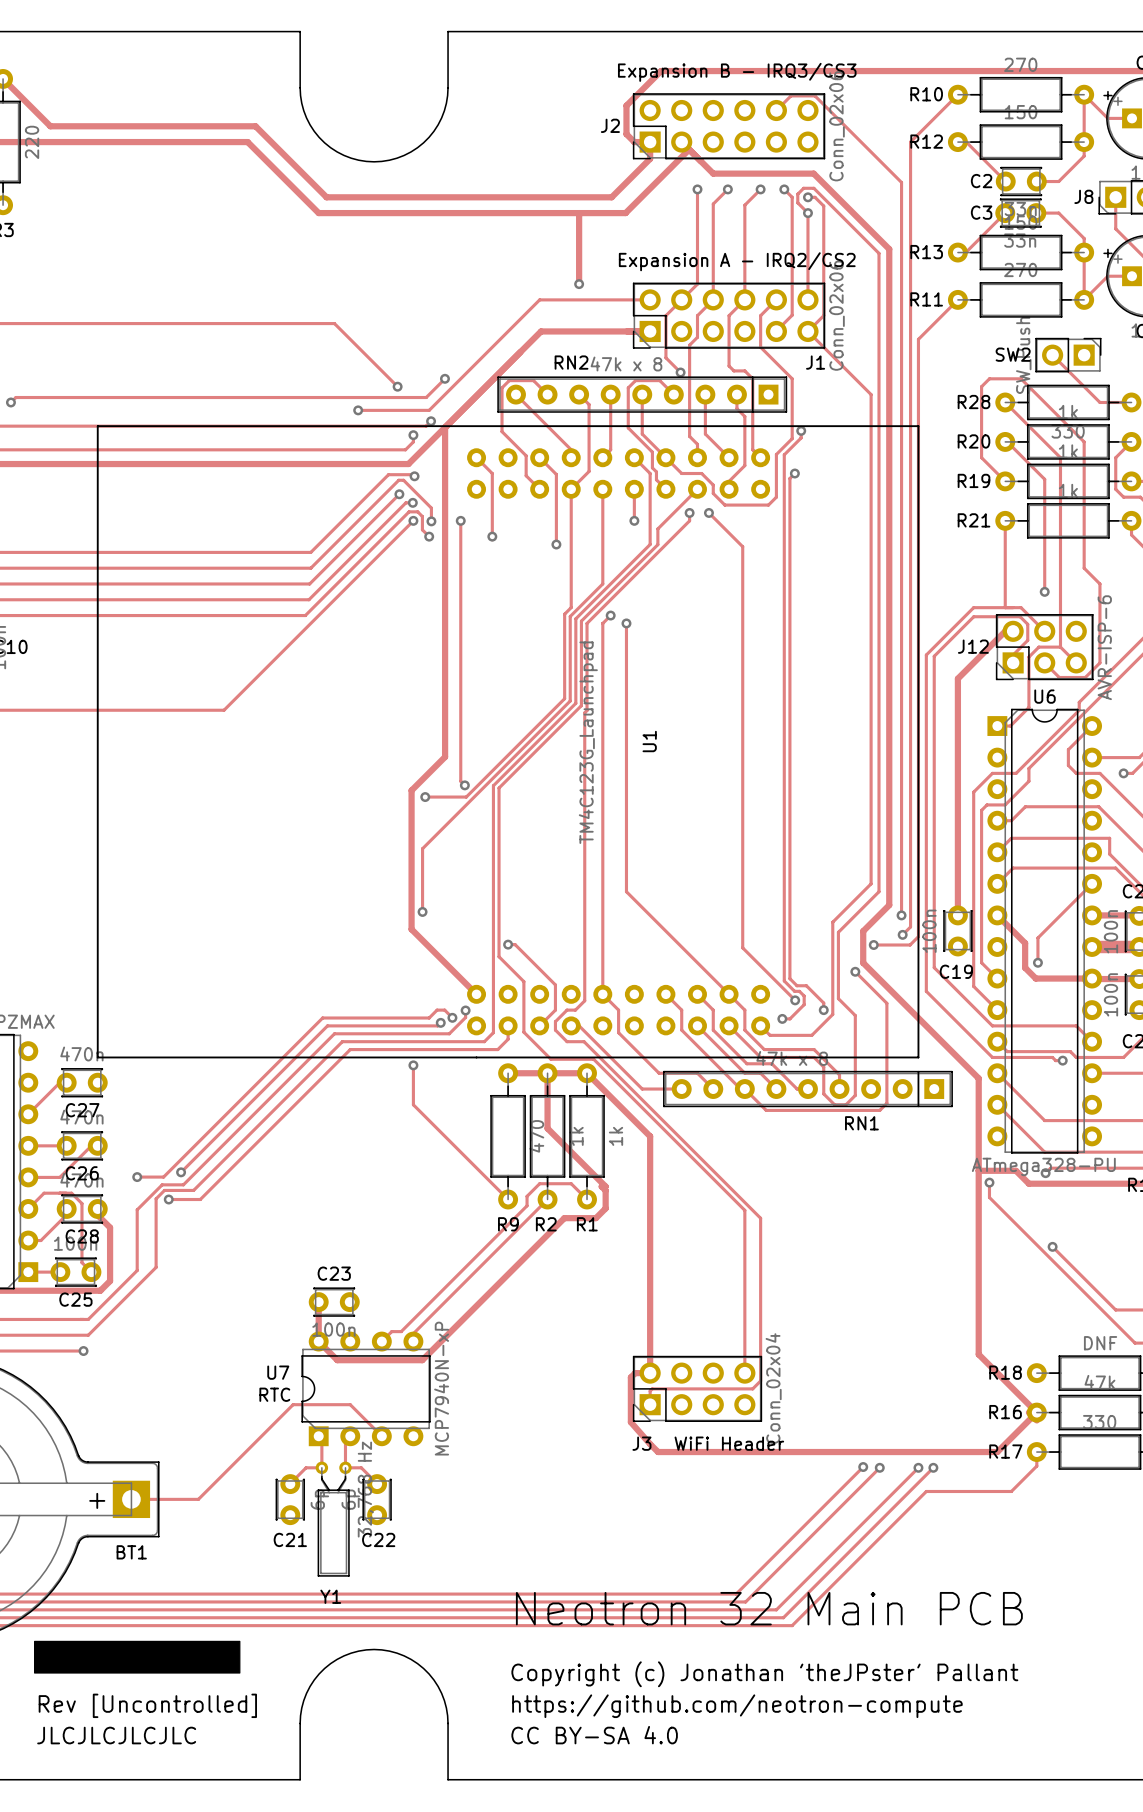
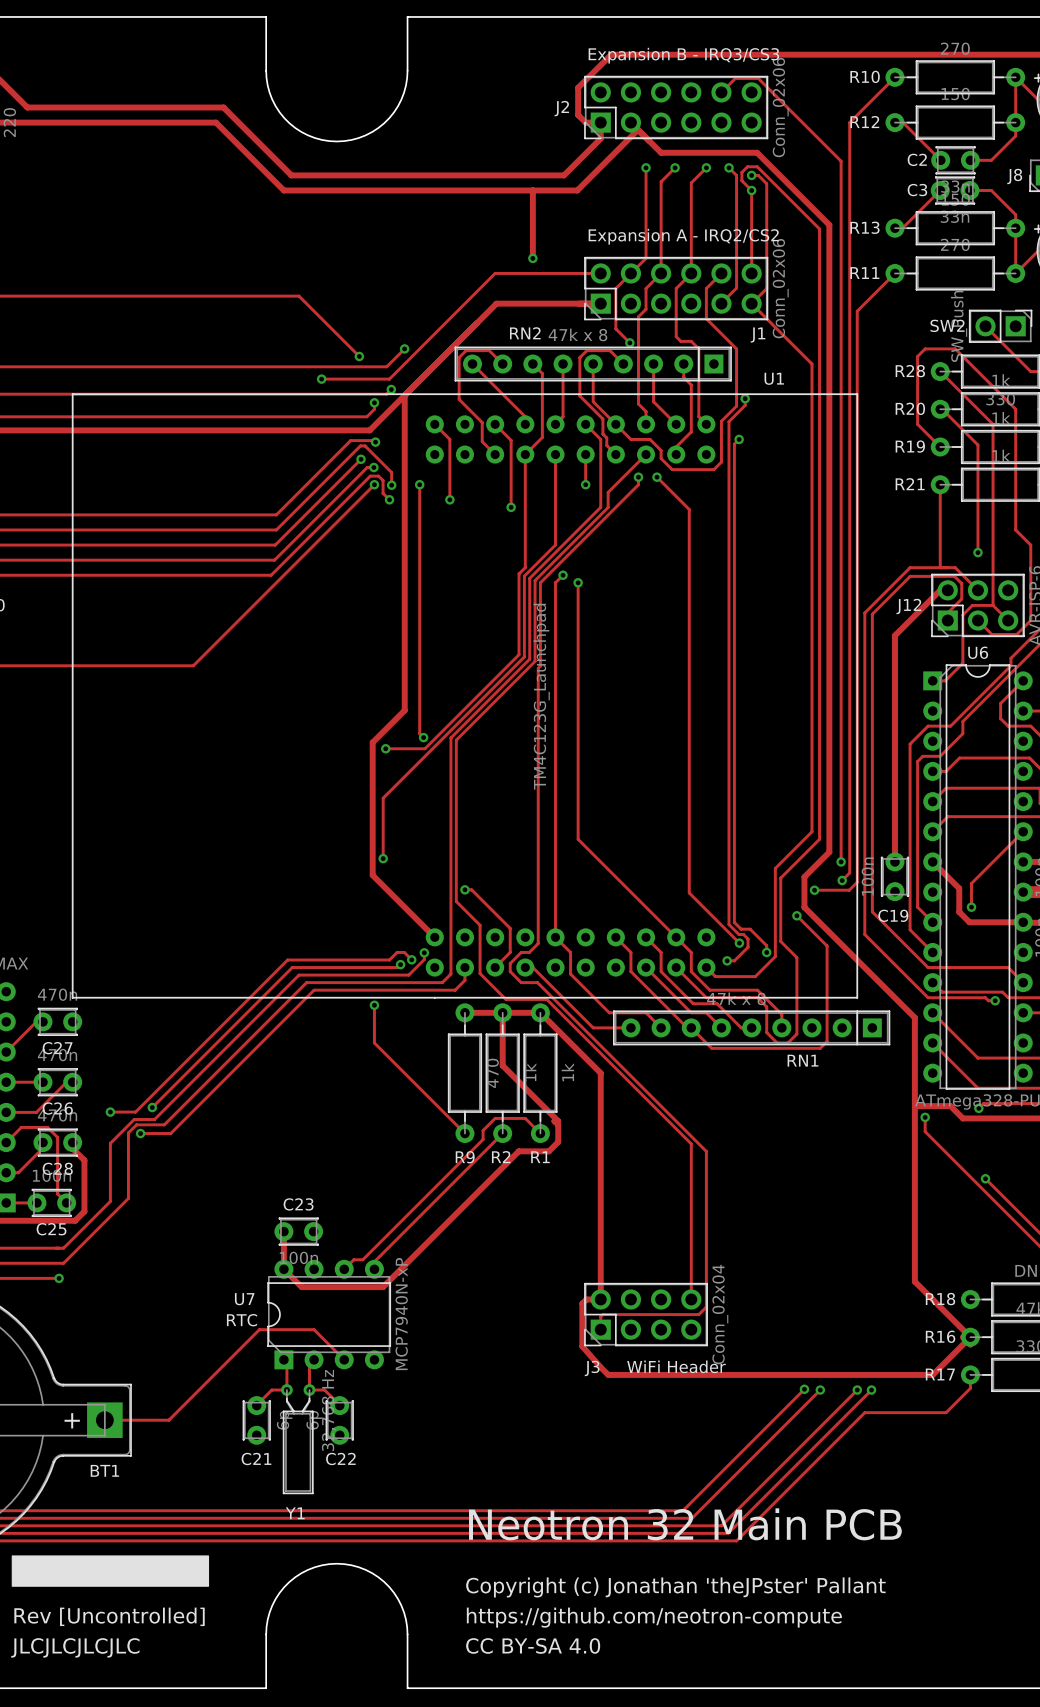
U1 name rotation: 0° (649, 741) -> 90° clockwise (774, 378)
U1 name position: U1 (649, 741) -> U1 (774, 378)

